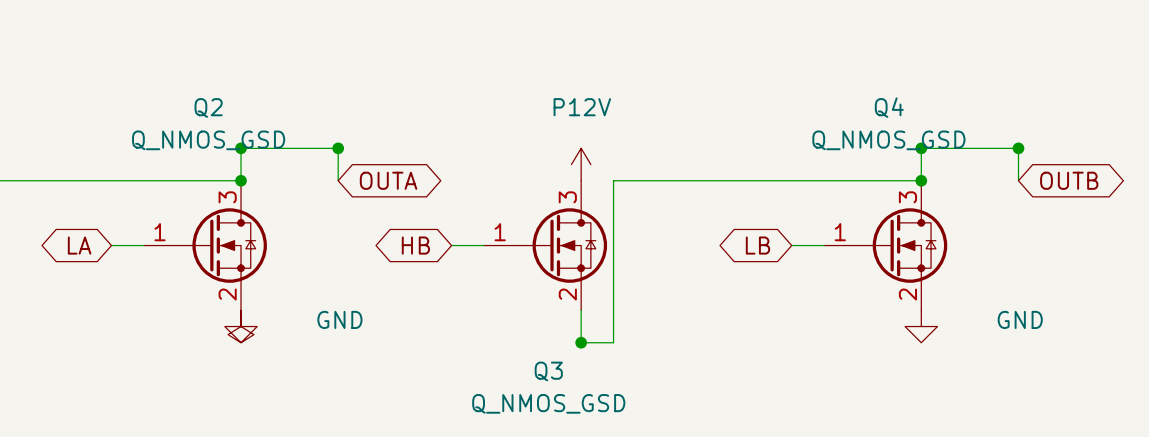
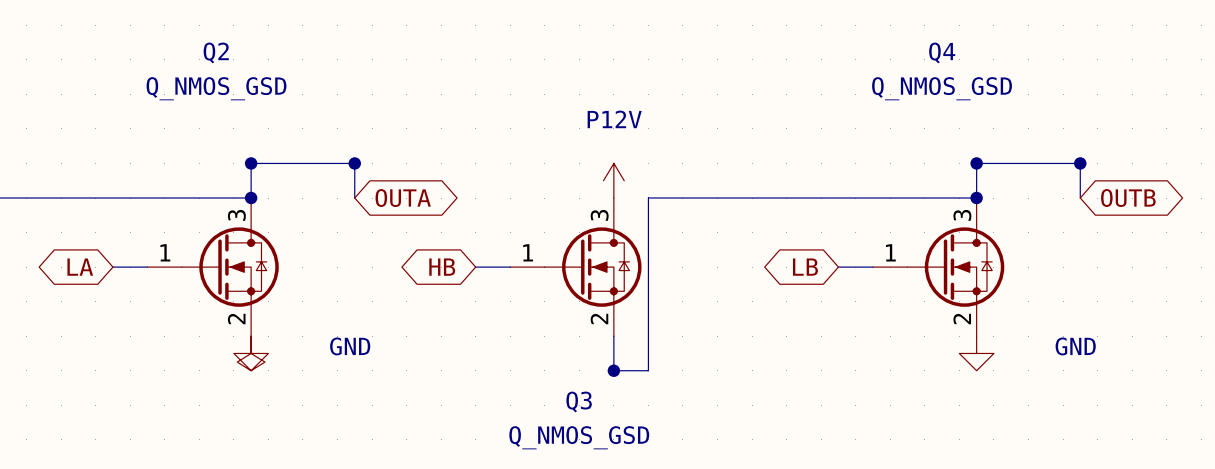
Q2 name position: Q2 (208, 107) -> Q2 (216, 52)
Q4 name position: Q4 (889, 107) -> Q4 (942, 52)
Q2 value position: Q_NMOS_GSD (208, 140) -> Q_NMOS_GSD (216, 88)
Q4 value position: Q_NMOS_GSD (888, 140) -> Q_NMOS_GSD (942, 88)

